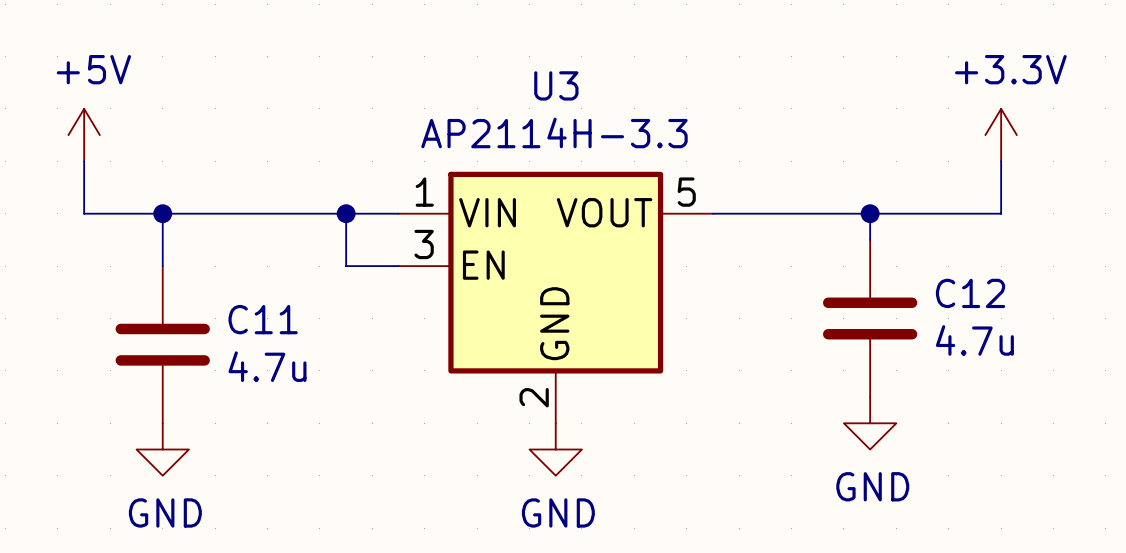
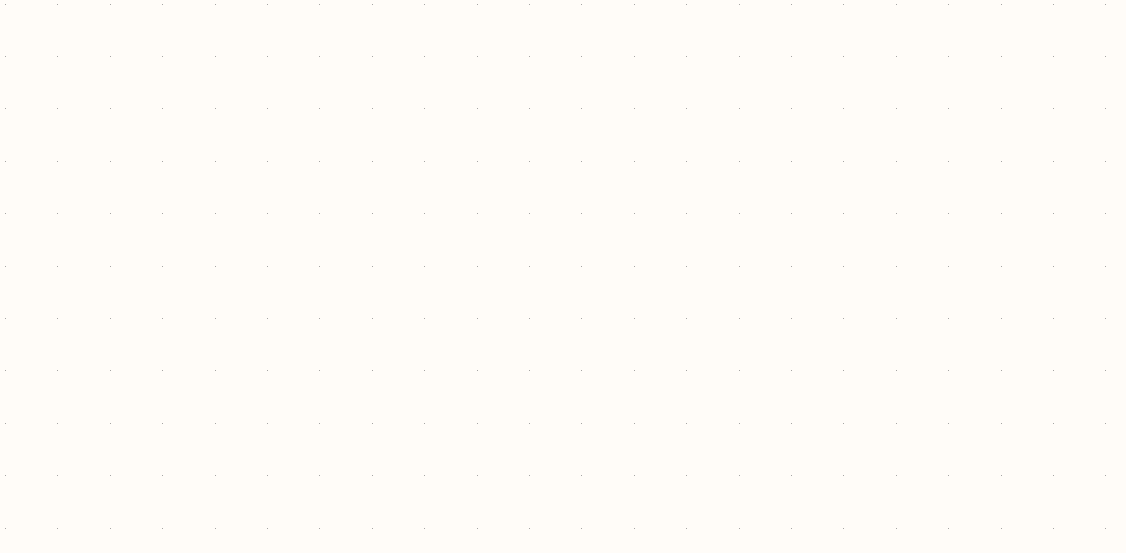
power symbol: +5V (84, 135) -> none
power symbol: +3.3V (1001, 135) -> none
wire: (84, 161) (84, 213) (398, 213) -> none
wire: (1001, 161) (1001, 213) (712, 213) -> none
wire: (162, 213) (162, 266) -> none
junction: (162, 213) -> none
wire: (346, 213) (346, 266) (398, 266) -> none
junction: (346, 213) -> none
wire: (870, 213) (870, 239) -> none
junction: (870, 213) -> none
U3: AP2114H-3.3 (555, 297) -> none
C12: 4.7u (870, 318) -> none
C11: 4.7u (162, 344) -> none
power symbol: GND (870, 423) -> none
power symbol: GND (162, 449) -> none
power symbol: GND (555, 449) -> none

